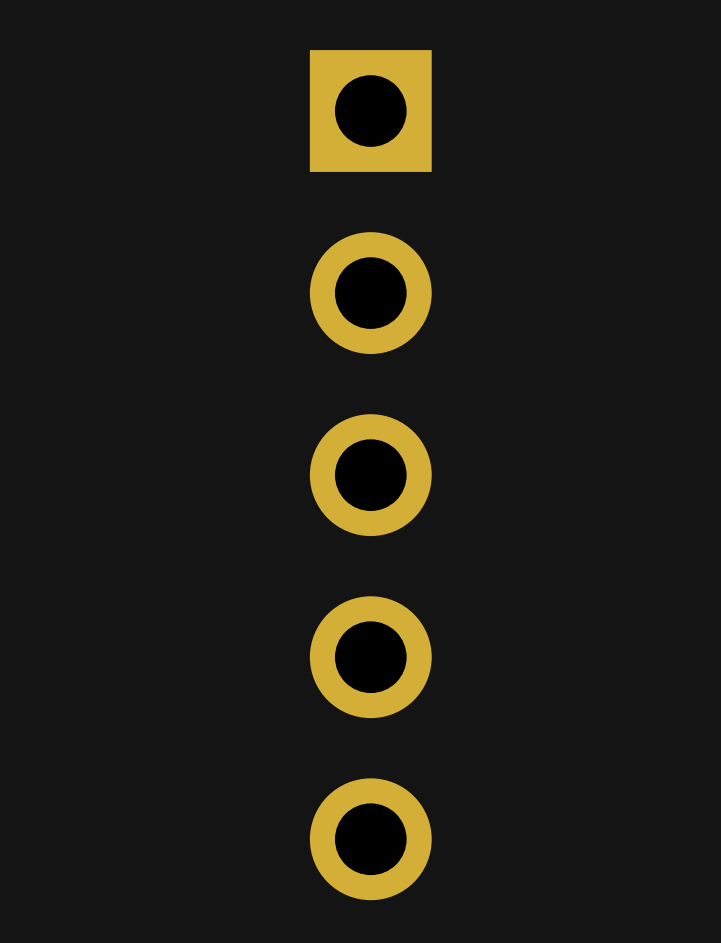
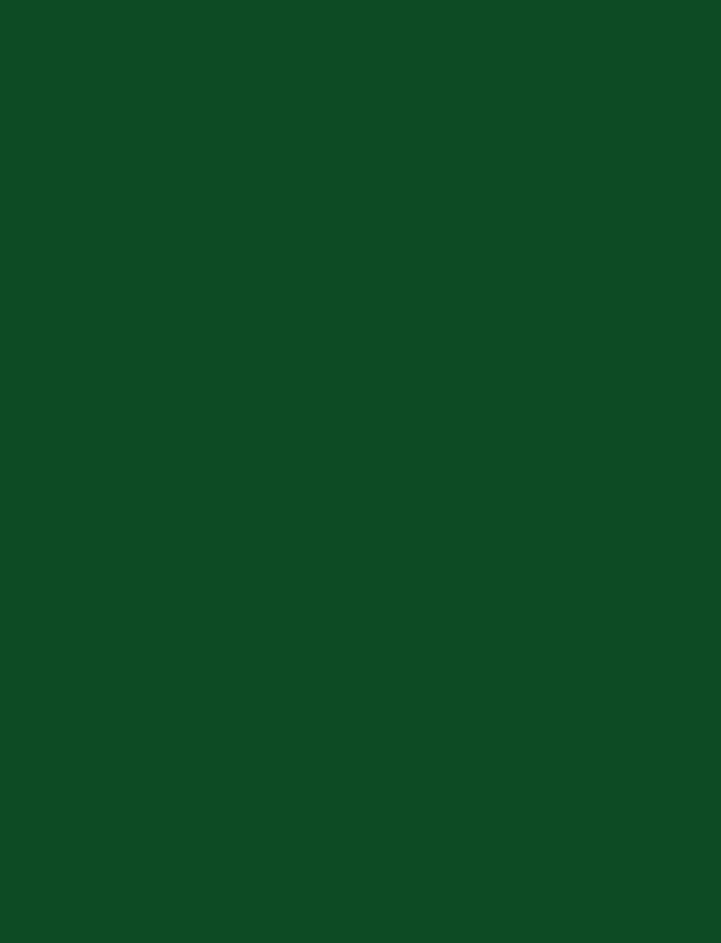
part: (370, 475) -> none

